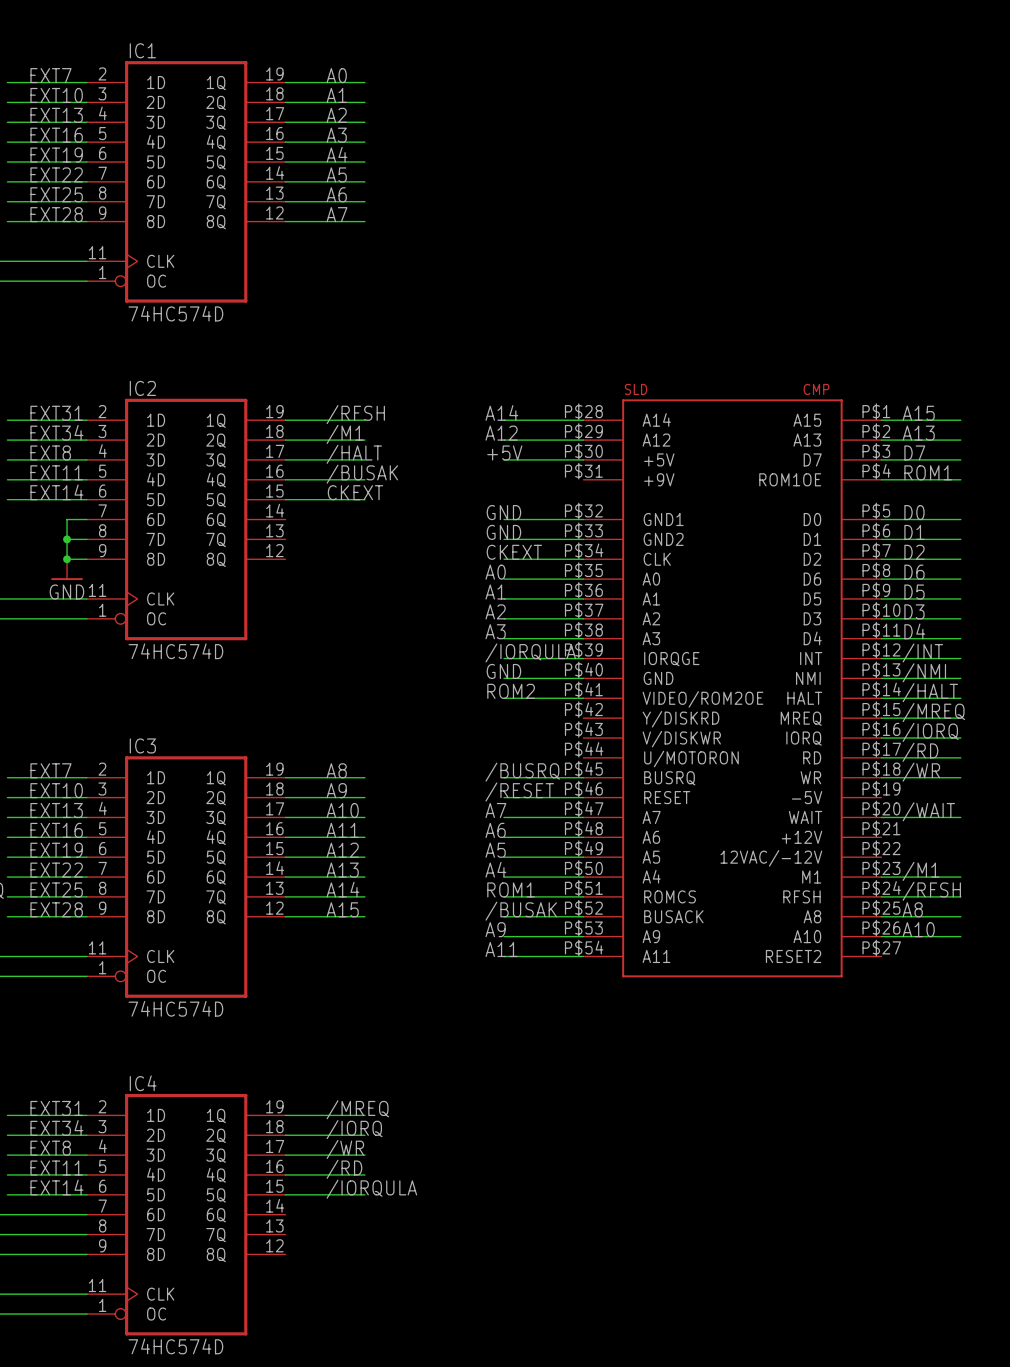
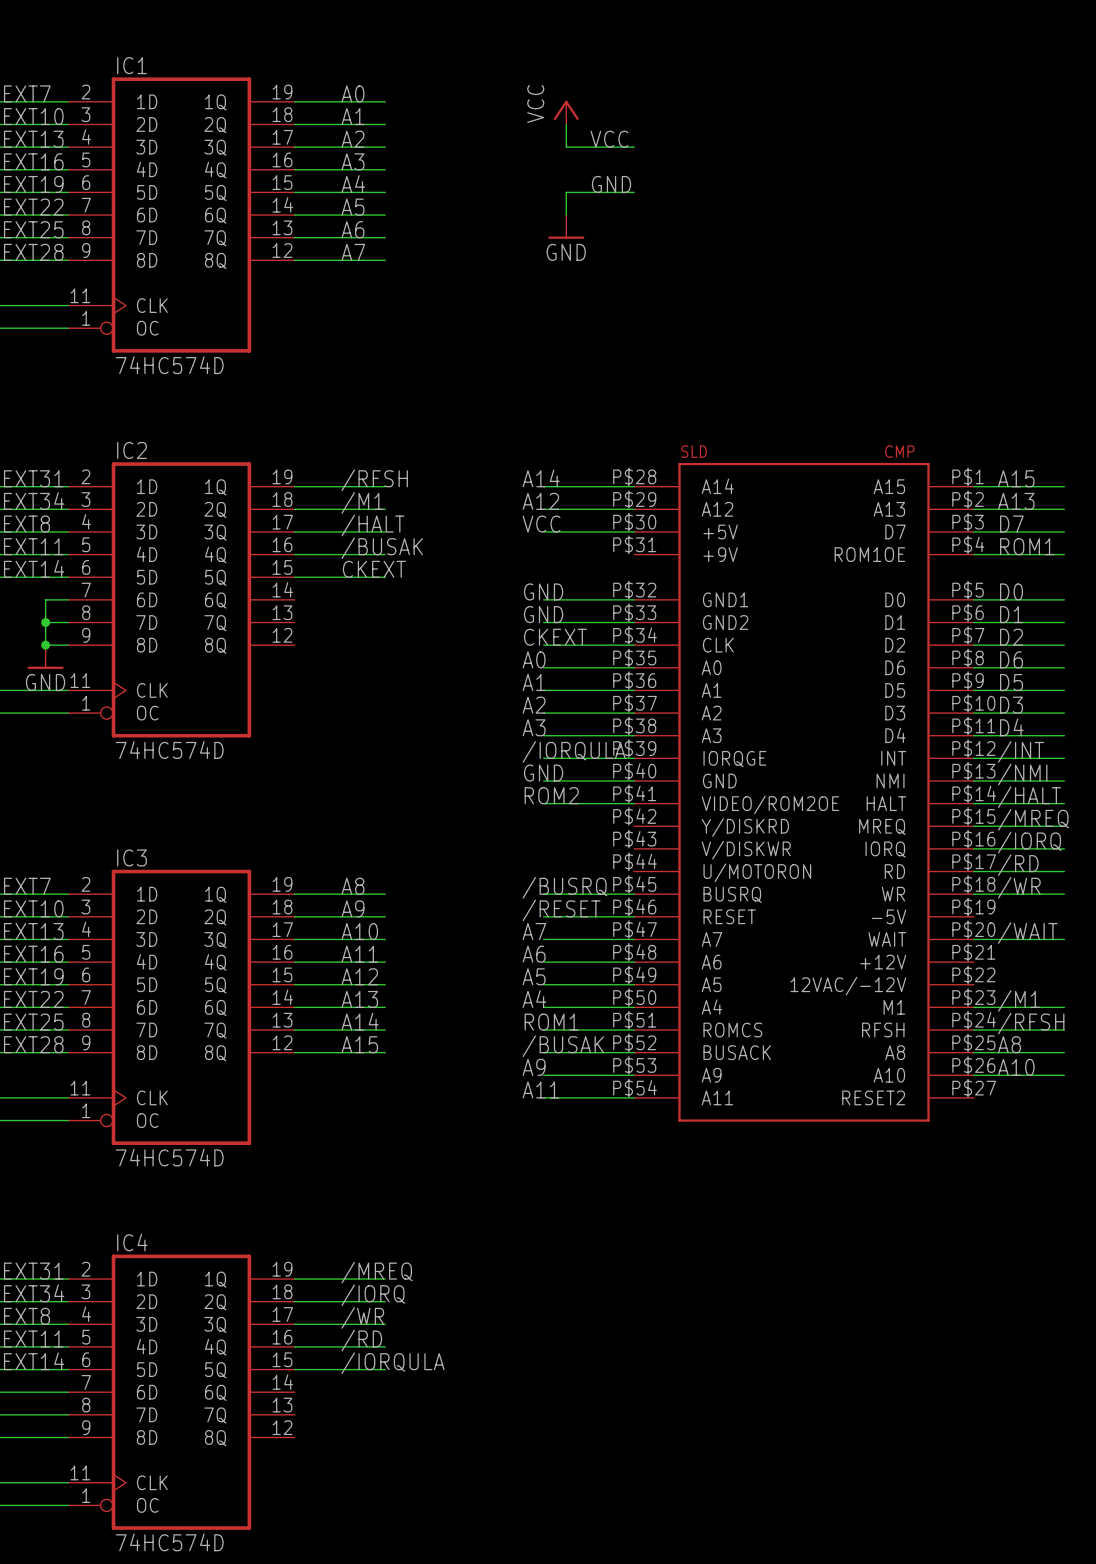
power symbol: none -> VCC (566, 112)
wire: none -> (566, 124) (566, 147) (634, 147)
label: none -> VCC (609, 139)
label: none -> GND (611, 184)
wire: none -> (634, 192) (566, 192) (566, 215)
power symbol: none -> GND (566, 226)
label: +5V (504, 452) -> VCC (541, 524)

